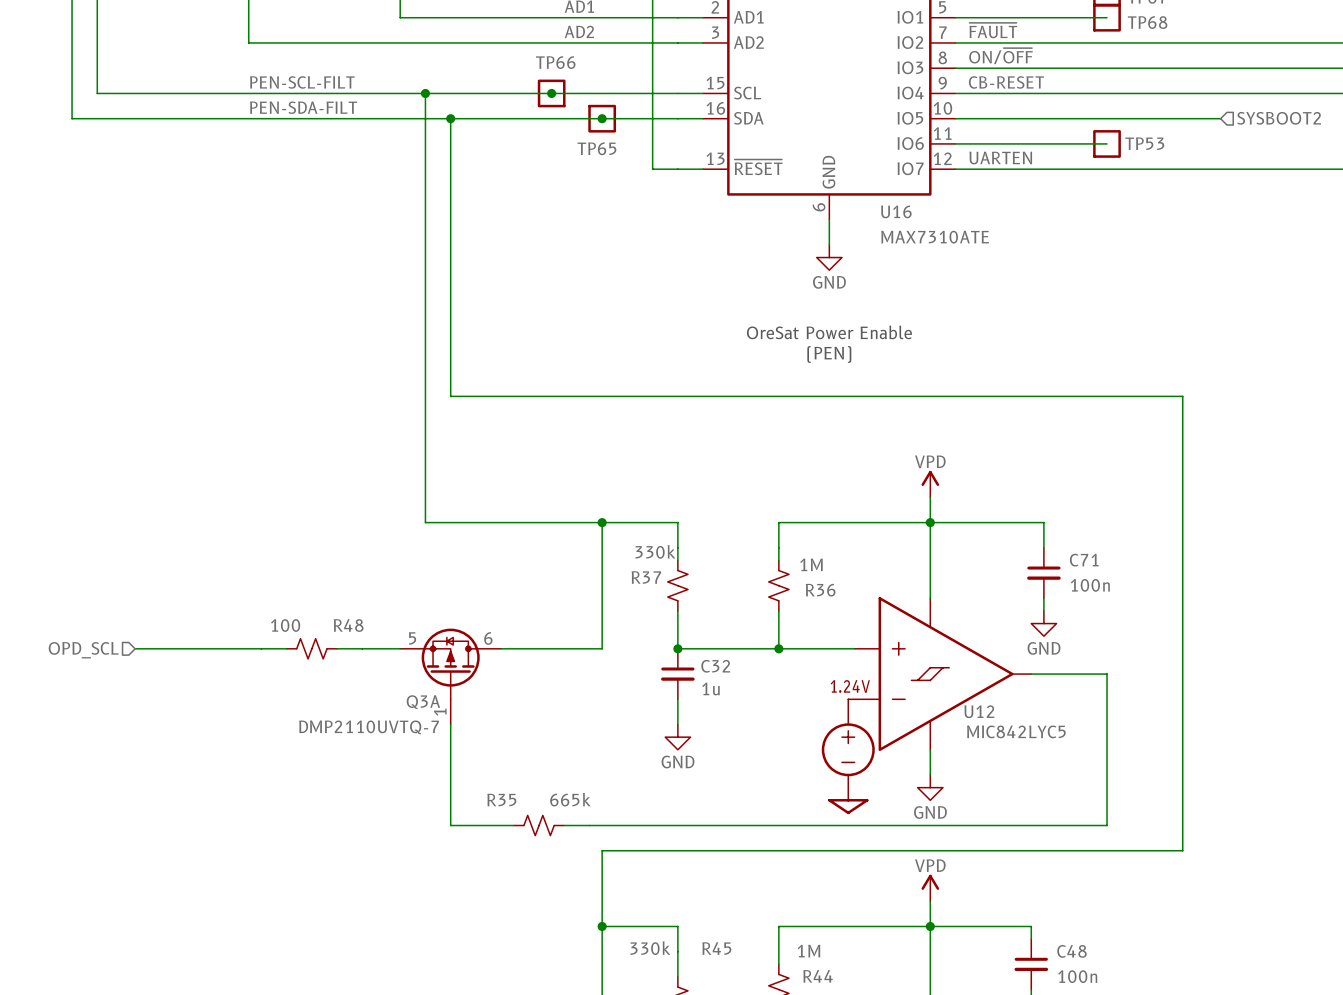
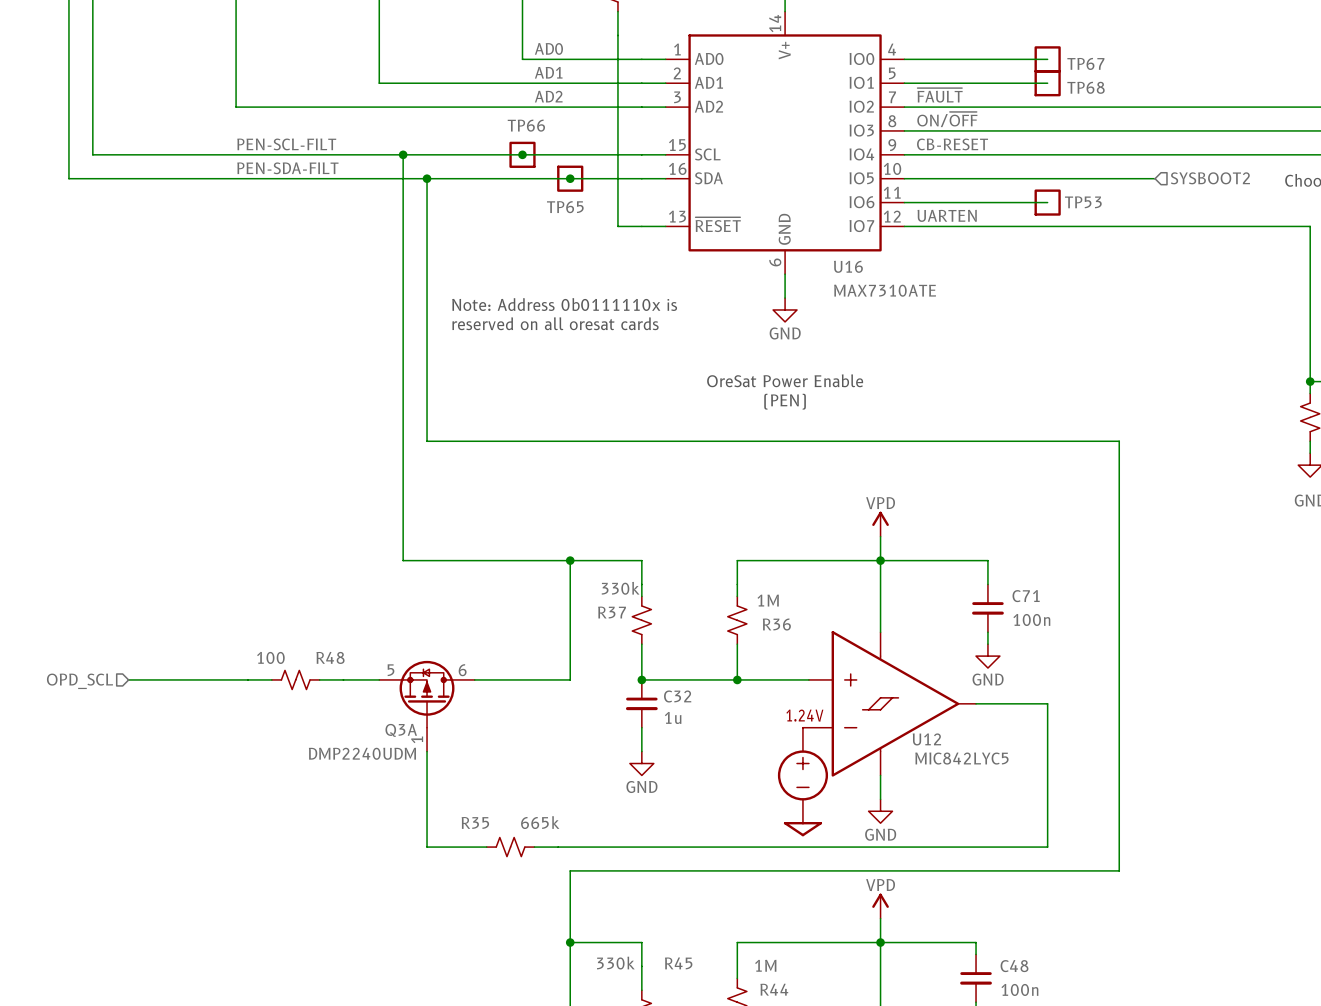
text: none -> Note: Address 0b0111110x is (564, 304)
text: none -> reserved on all oresat cards (555, 323)
Q3A value: DMP2110UVTQ-7 (369, 727) -> DMP2240UDM (362, 753)

